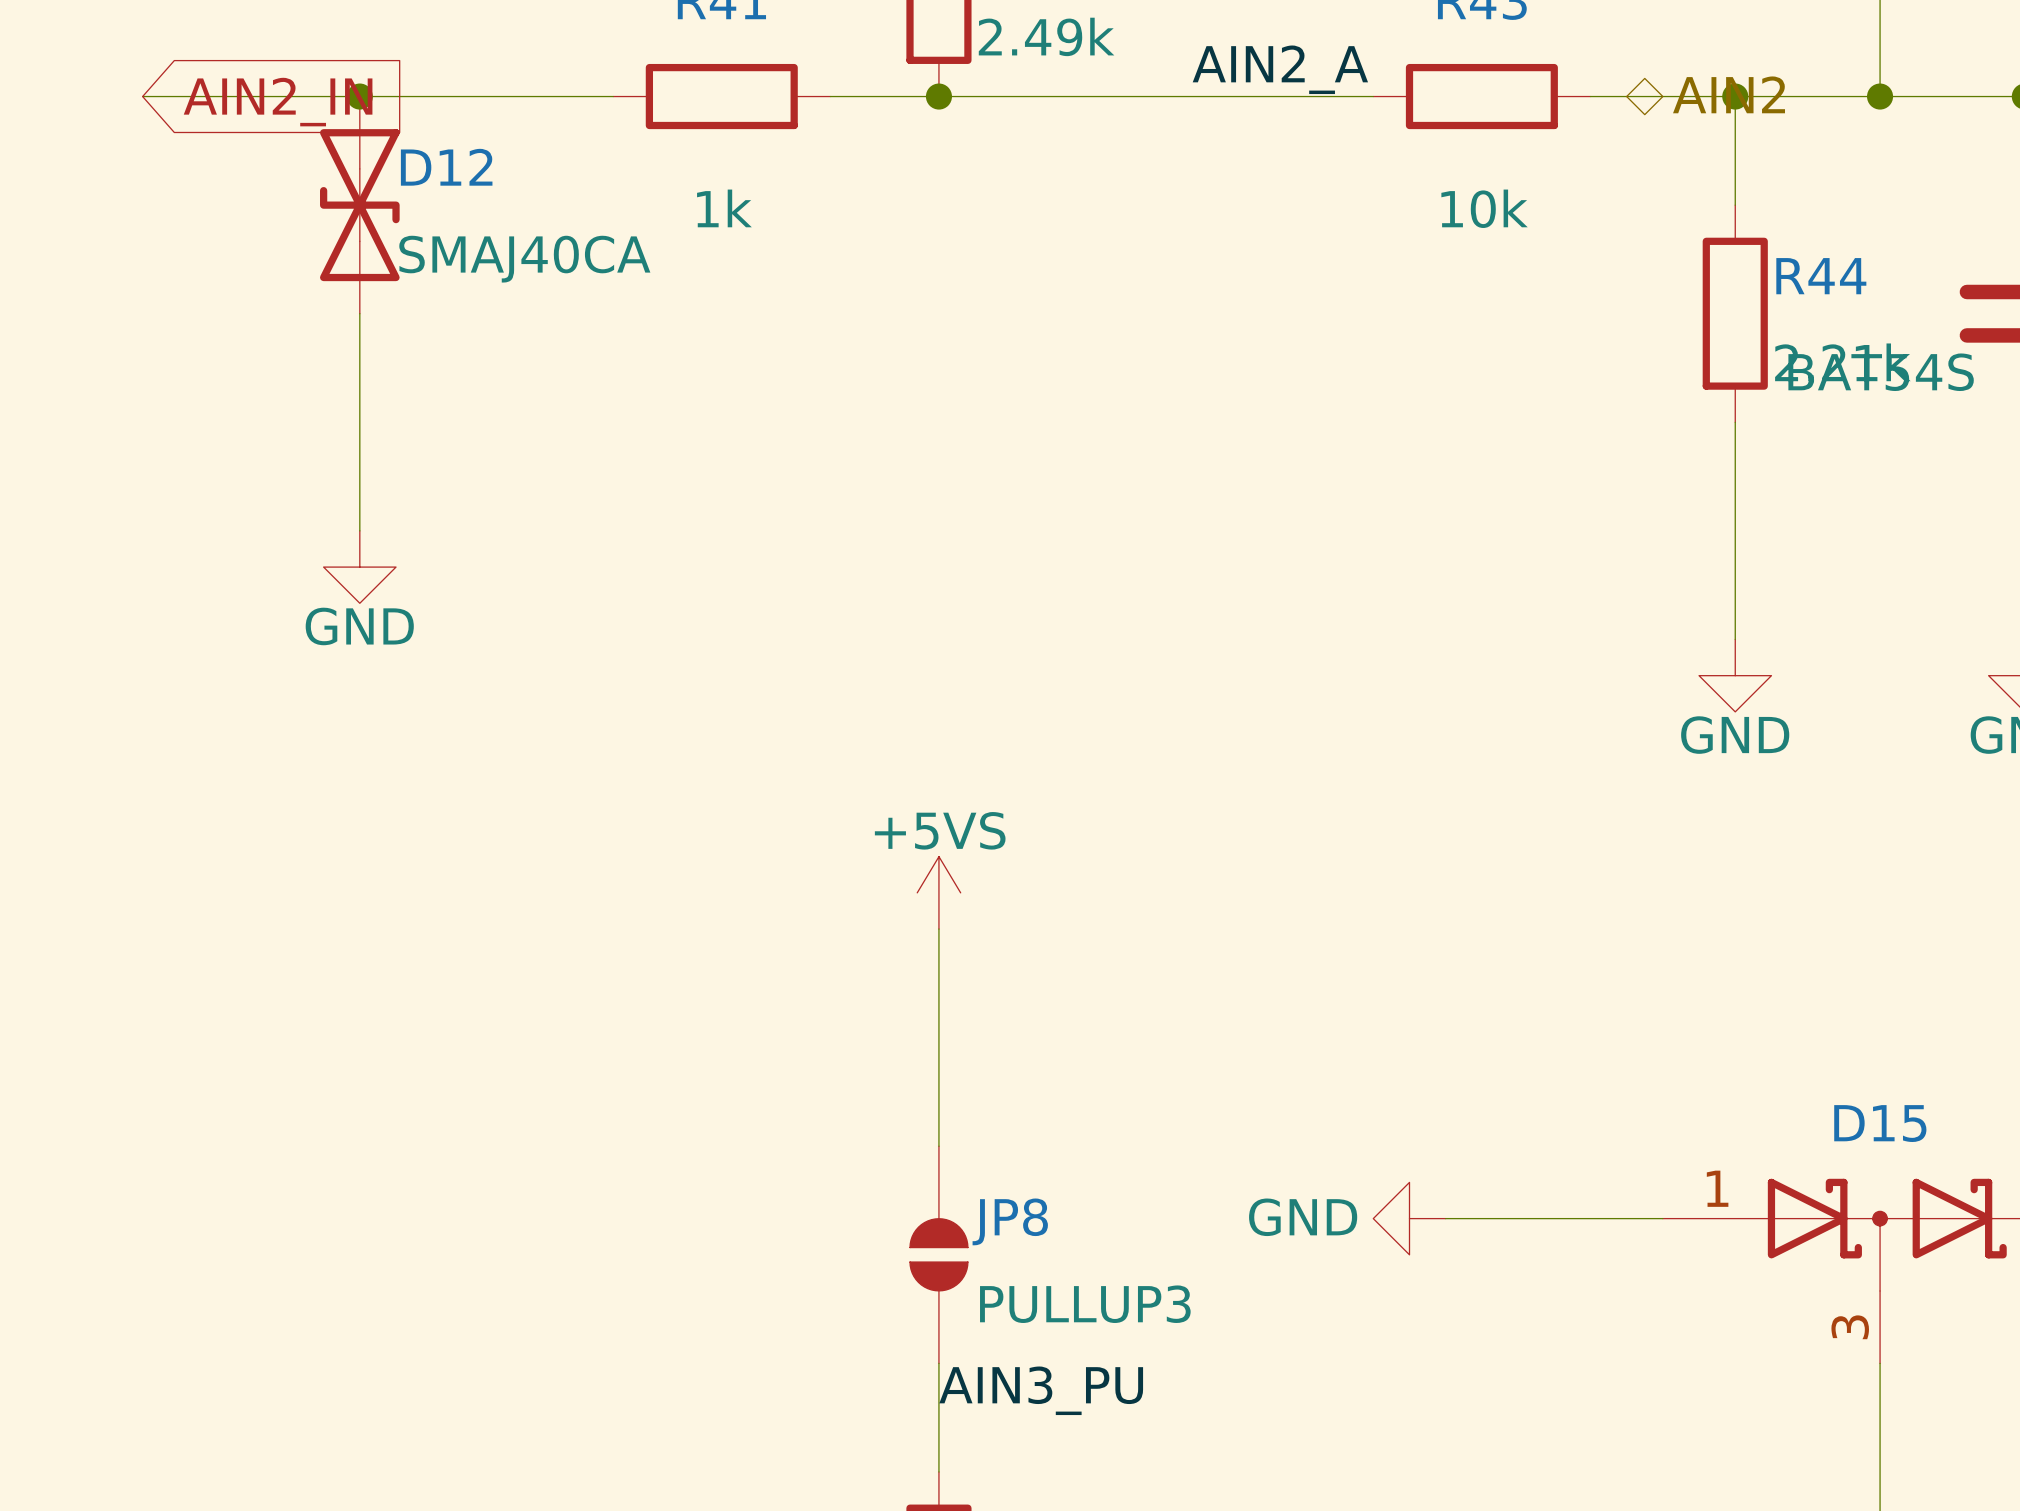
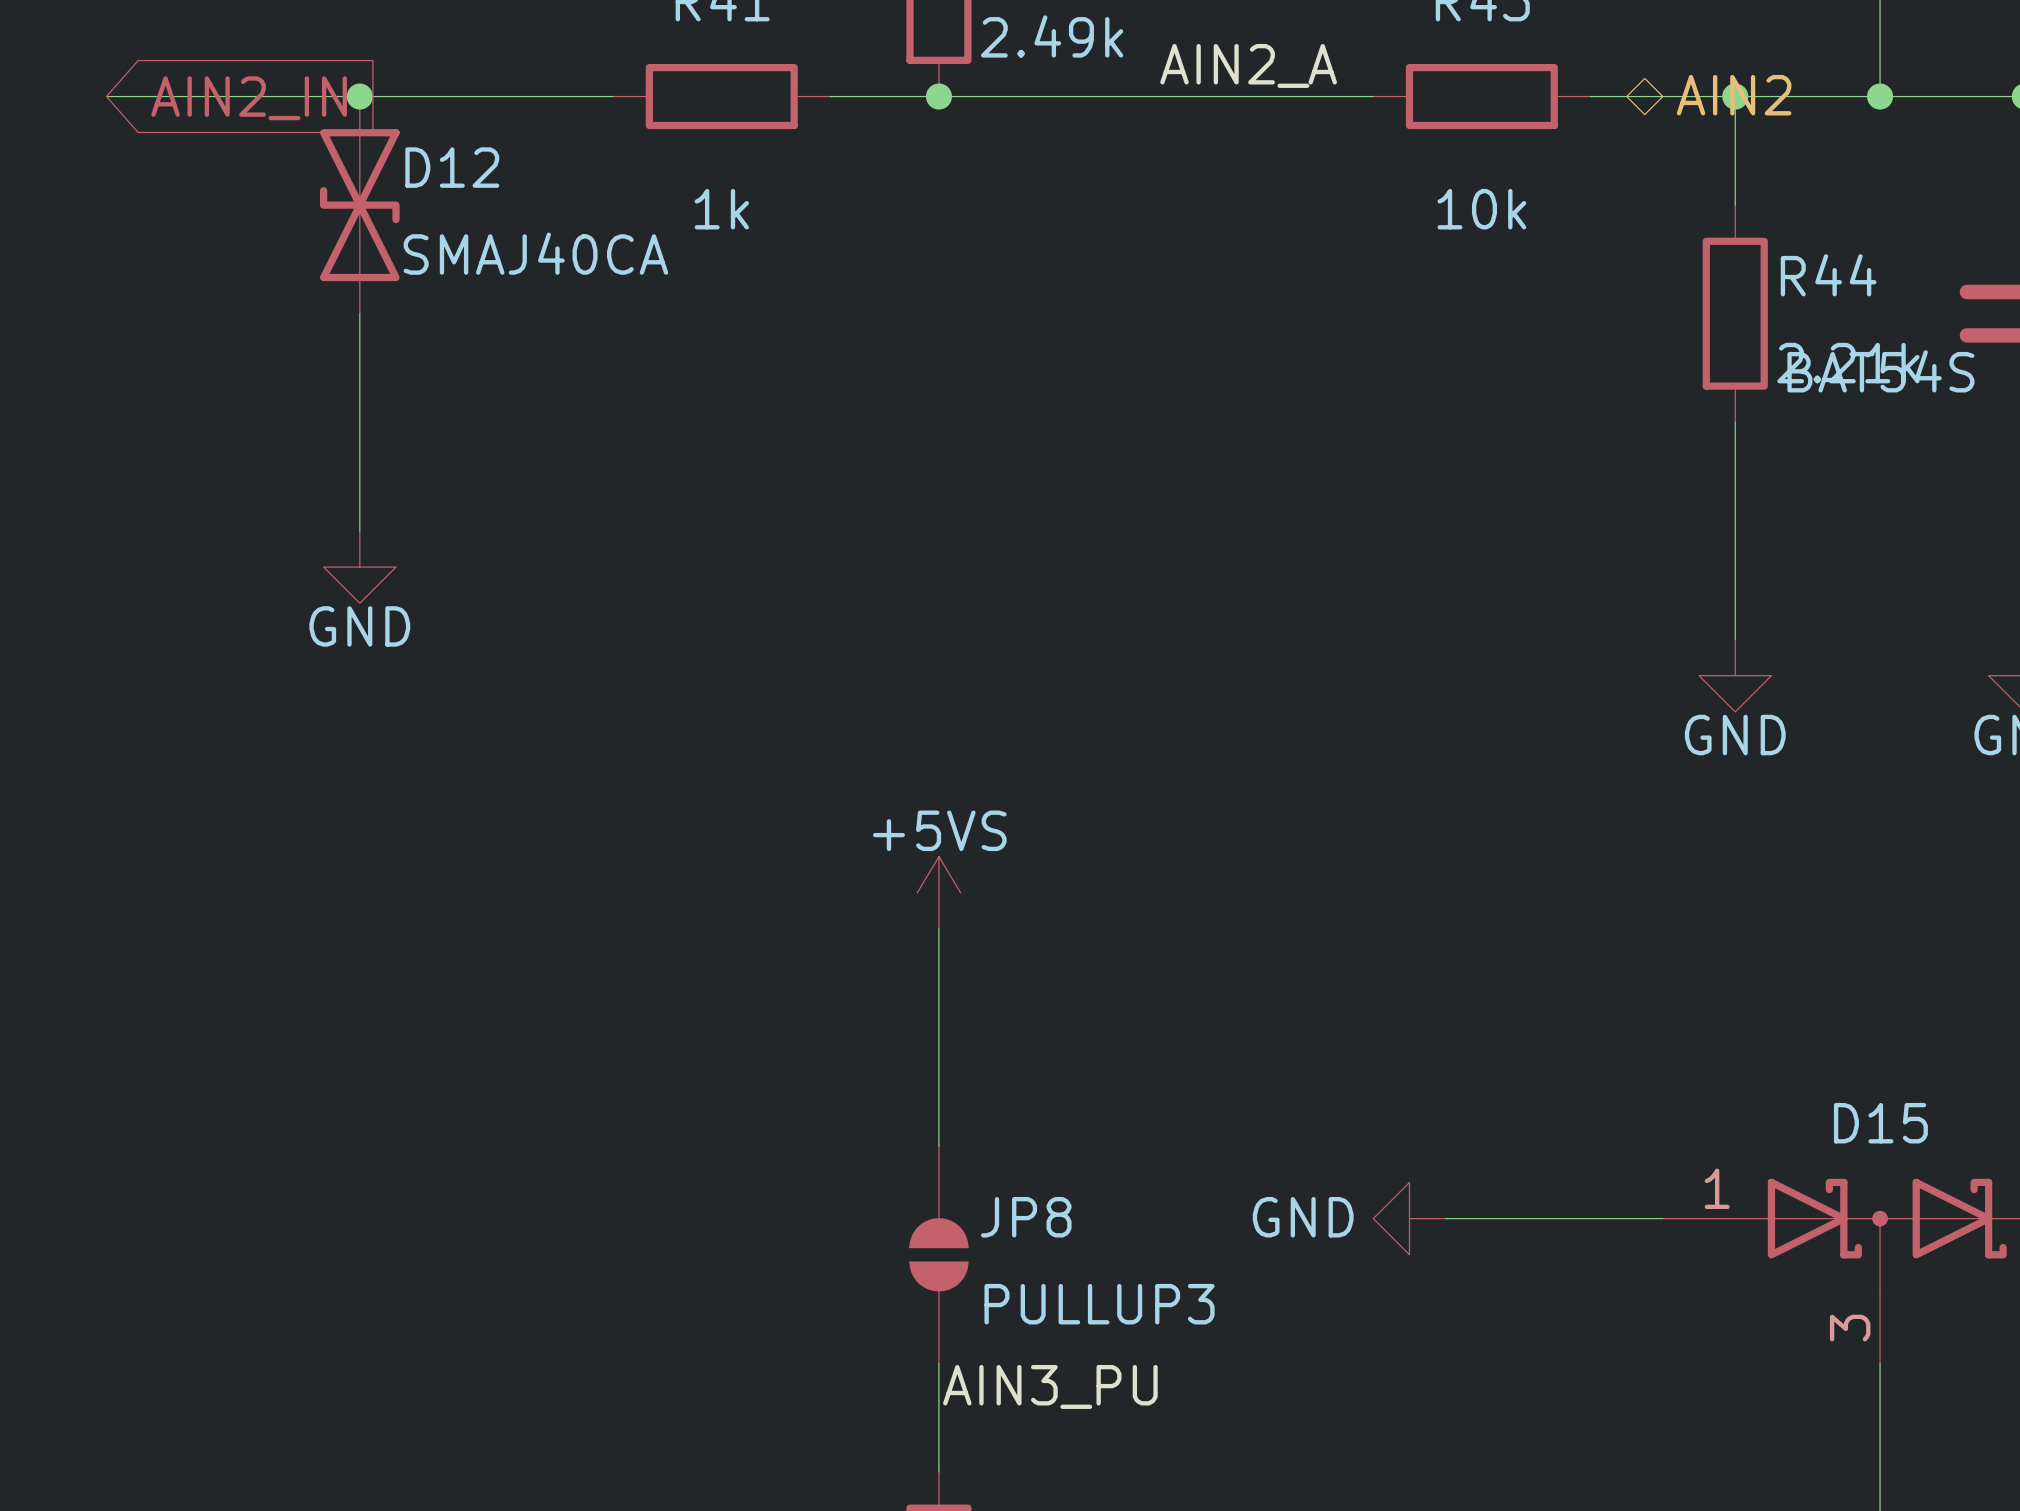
label position: AIN2_A (1280, 69) -> AIN2_A (1248, 65)
wire: none -> (106, 96) (142, 96)
global label position: AIN2_IN (278, 102) -> AIN2_IN (249, 98)

